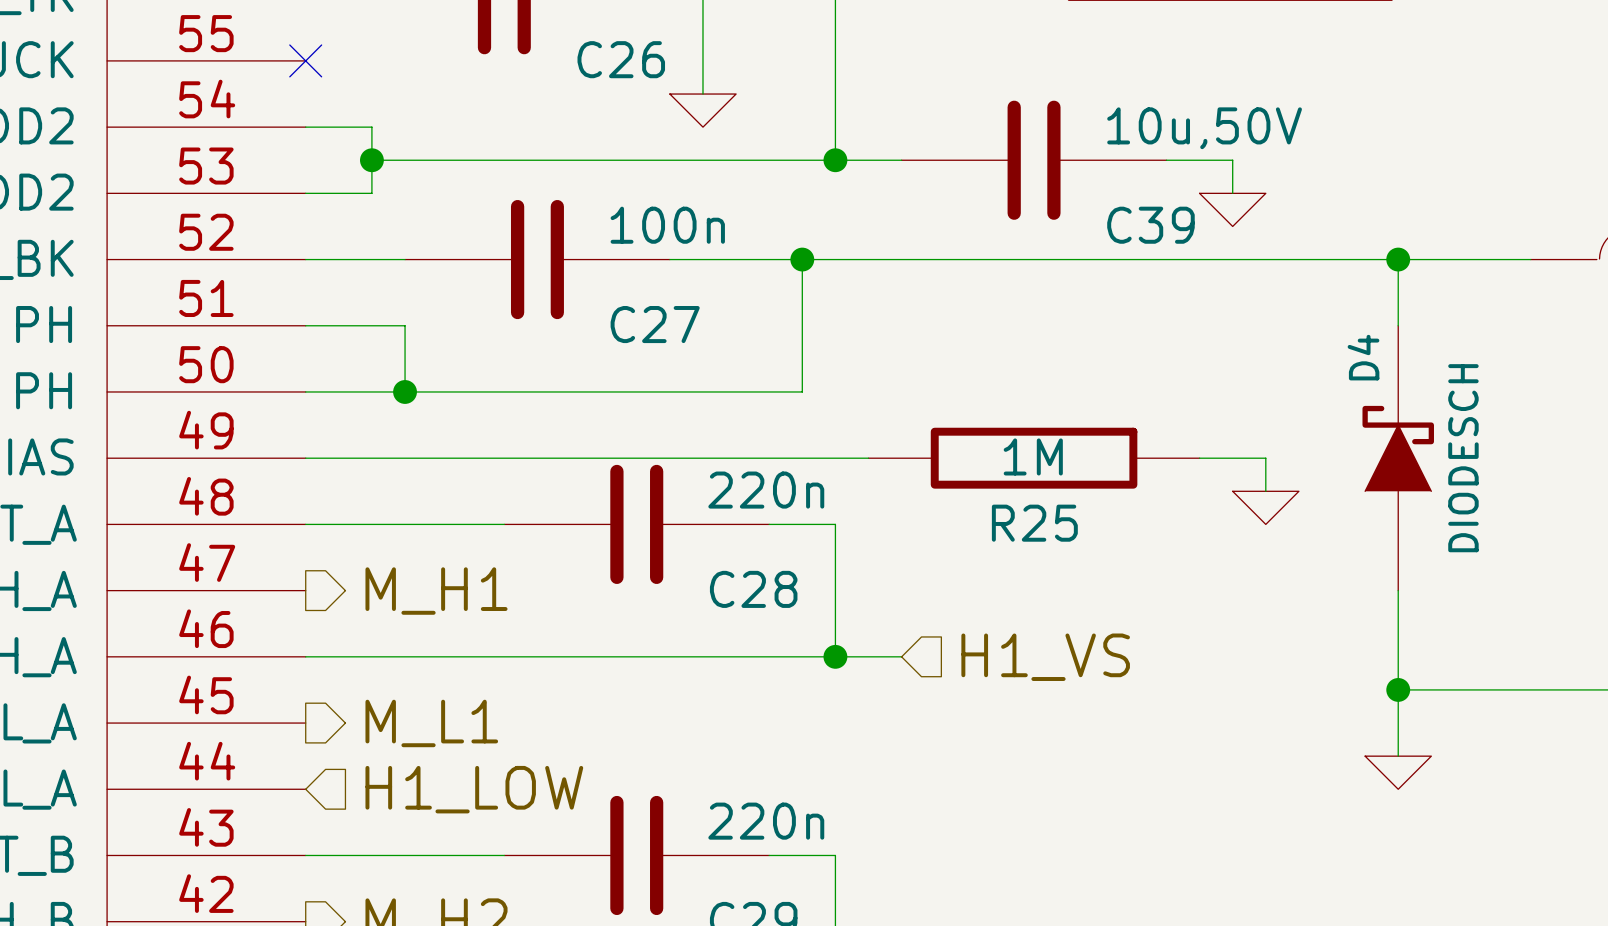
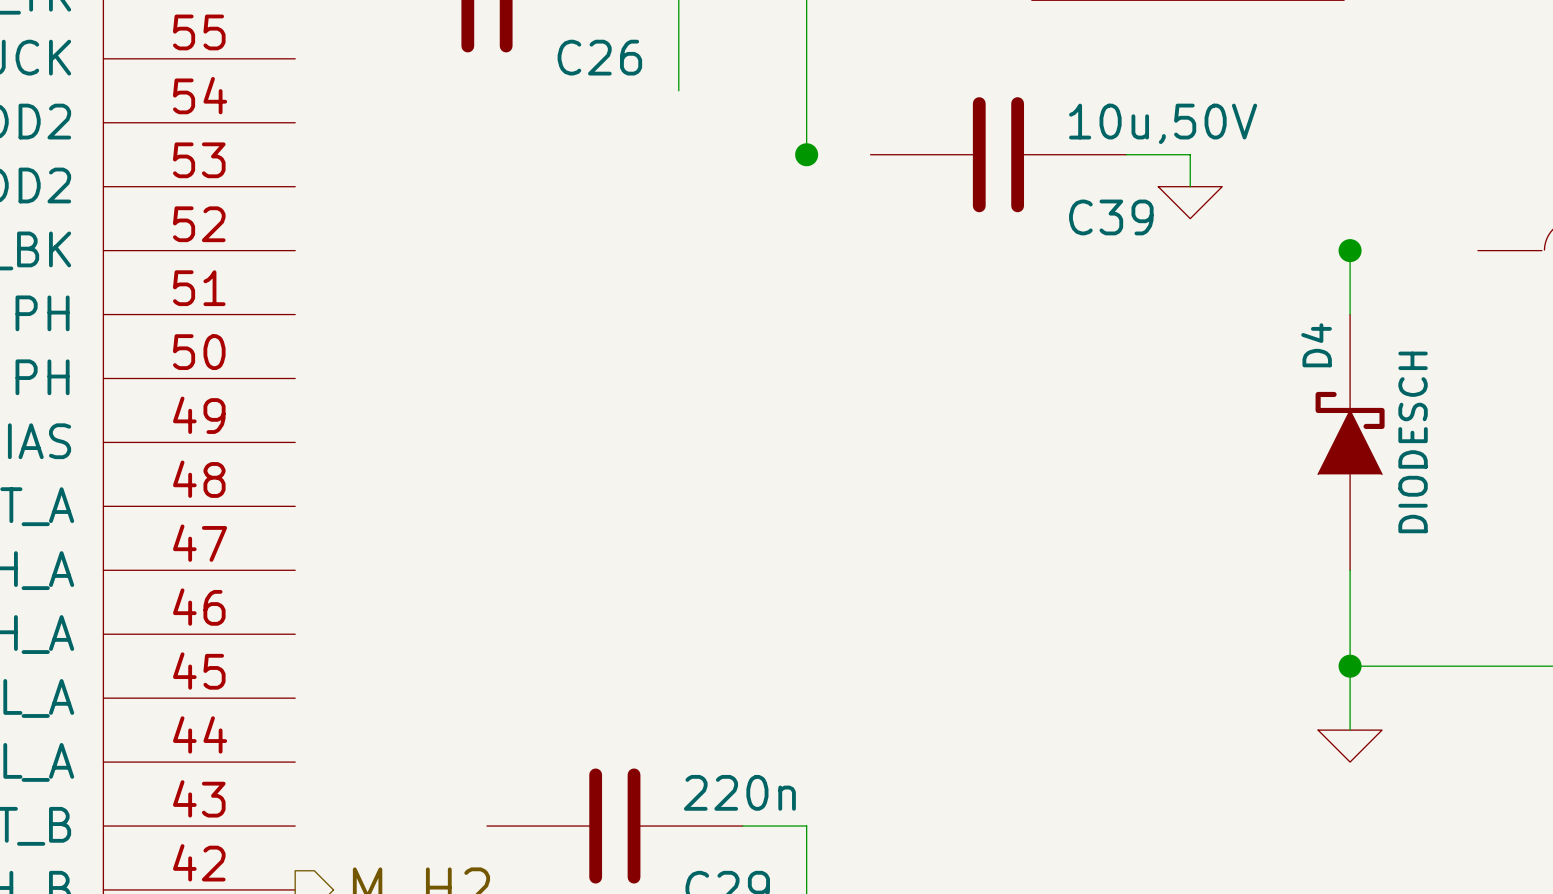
no-connect mark: (305, 60) -> none
power symbol: (702, 110) -> none
wire: (305, 127) (371, 127) (371, 193) (305, 193) -> none
wire: (371, 160) (901, 160) -> none
junction: (371, 160) -> none
wire: (305, 259) (405, 259) -> none
C27: 100n (537, 259) -> none
wire: (669, 259) (1530, 259) -> none
wire: (802, 259) (802, 391) (305, 391) -> none
junction: (802, 259) -> none
wire: (305, 325) (405, 325) (405, 391) -> none
junction: (405, 391) -> none
wire: (305, 458) (868, 458) -> none
R25: 1M (1034, 458) -> none
wire: (1199, 458) (1265, 458) (1265, 491) -> none
power symbol: (1265, 507) -> none
wire: (305, 524) (504, 524) -> none
C28: 220n (636, 524) -> none
wire: (769, 524) (835, 524) (835, 656) -> none
hierarchical label: M_H1 (436, 591) -> none
wire: (305, 656) (901, 656) -> none
junction: (835, 656) -> none
hierarchical label: H1_VS (1045, 657) -> none
hierarchical label: M_L1 (431, 723) -> none
hierarchical label: H1_LOW (474, 789) -> none
wire: (305, 855) (504, 855) -> none

